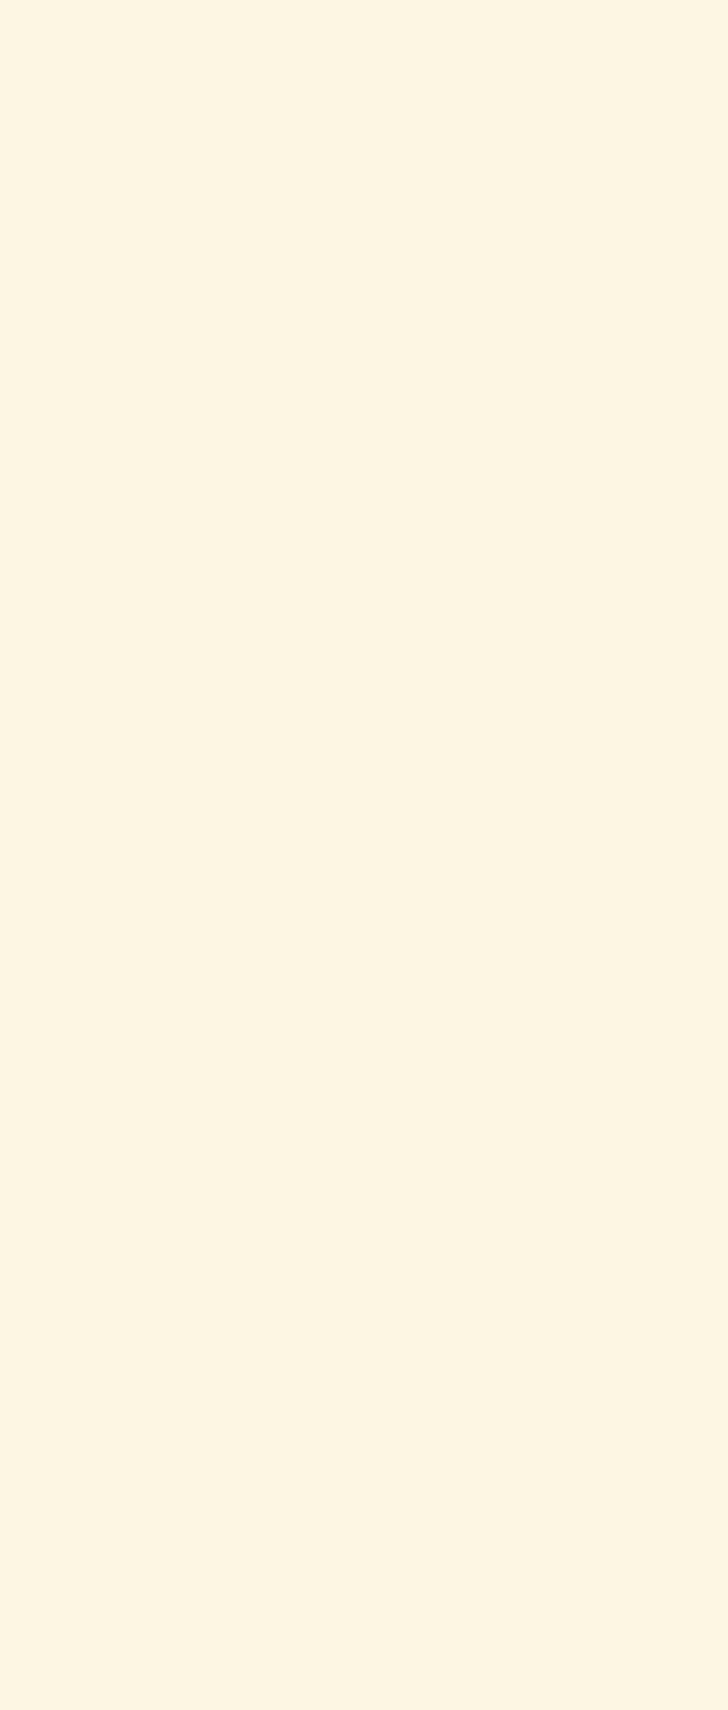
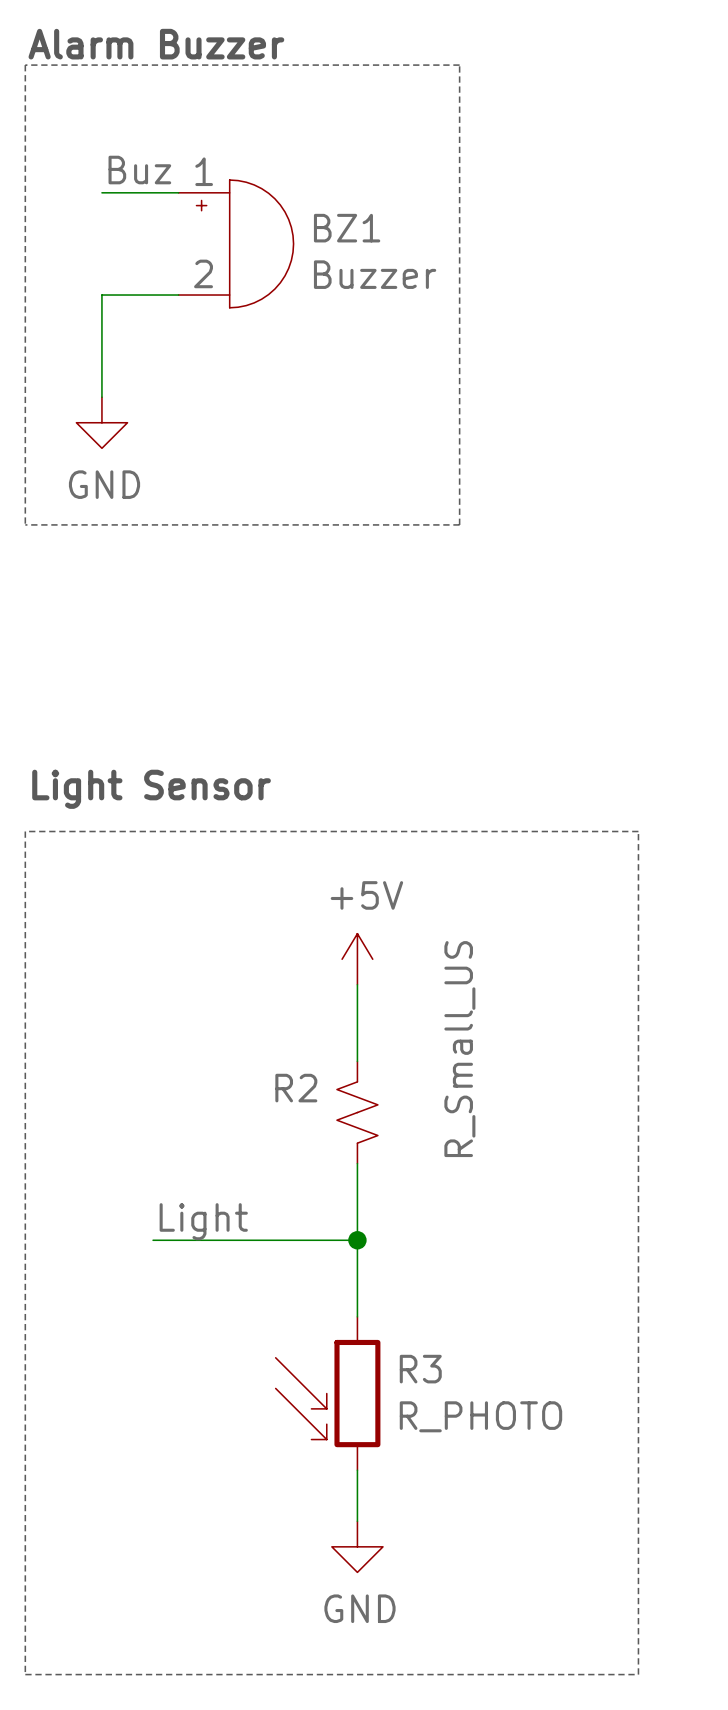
text: none -> Alarm Buzzer (156, 44)
line: none -> (25, 65) (459, 65) (459, 524) (25, 524) (25, 65)
label: none -> Buz (139, 170)
wire: none -> (101, 192) (178, 192)
BZ1: none -> Buzzer (236, 243)
wire: none -> (178, 295) (101, 295) (101, 397)
power symbol: none -> GND (101, 422)
text: none -> Light Sensor (151, 789)
line: none -> (25, 831) (25, 1674) (638, 1674) (638, 831) (25, 831)
power symbol: none -> +5V (357, 959)
wire: none -> (357, 984) (357, 1061)
R2: none -> R_Small_US (357, 1112)
wire: none -> (357, 1163) (357, 1316)
label: none -> Light (203, 1221)
wire: none -> (153, 1240) (357, 1240)
junction: none -> (357, 1240)
R3: none -> R_PHOTO (328, 1393)
wire: none -> (357, 1470) (357, 1521)
power symbol: none -> GND (357, 1546)

